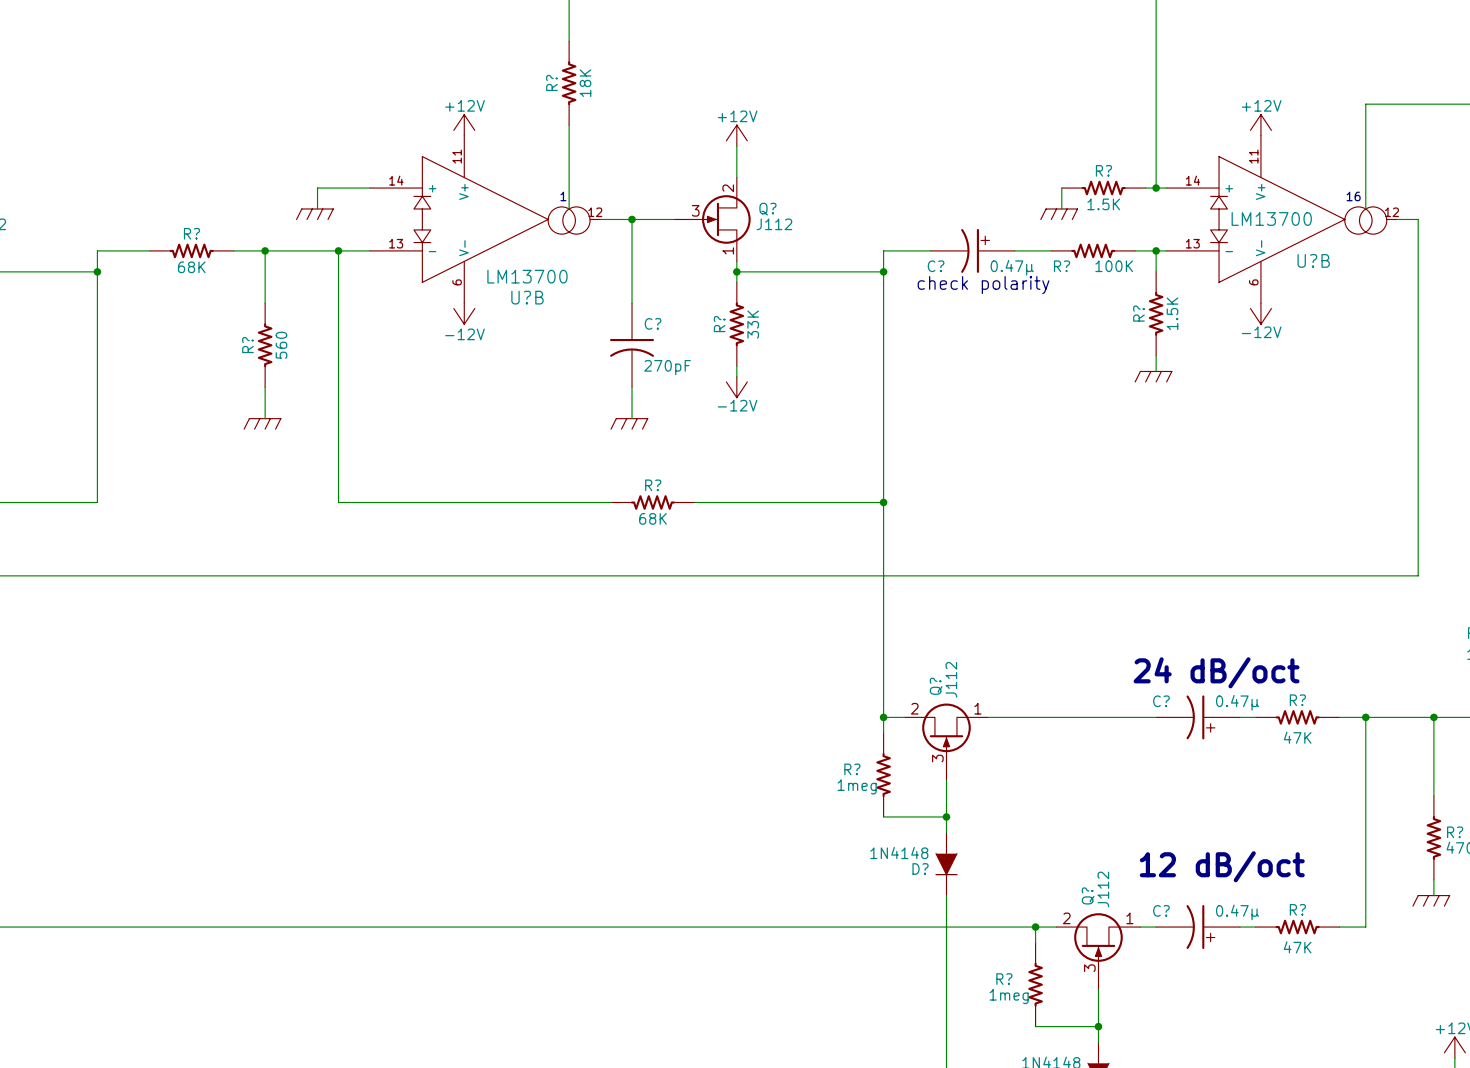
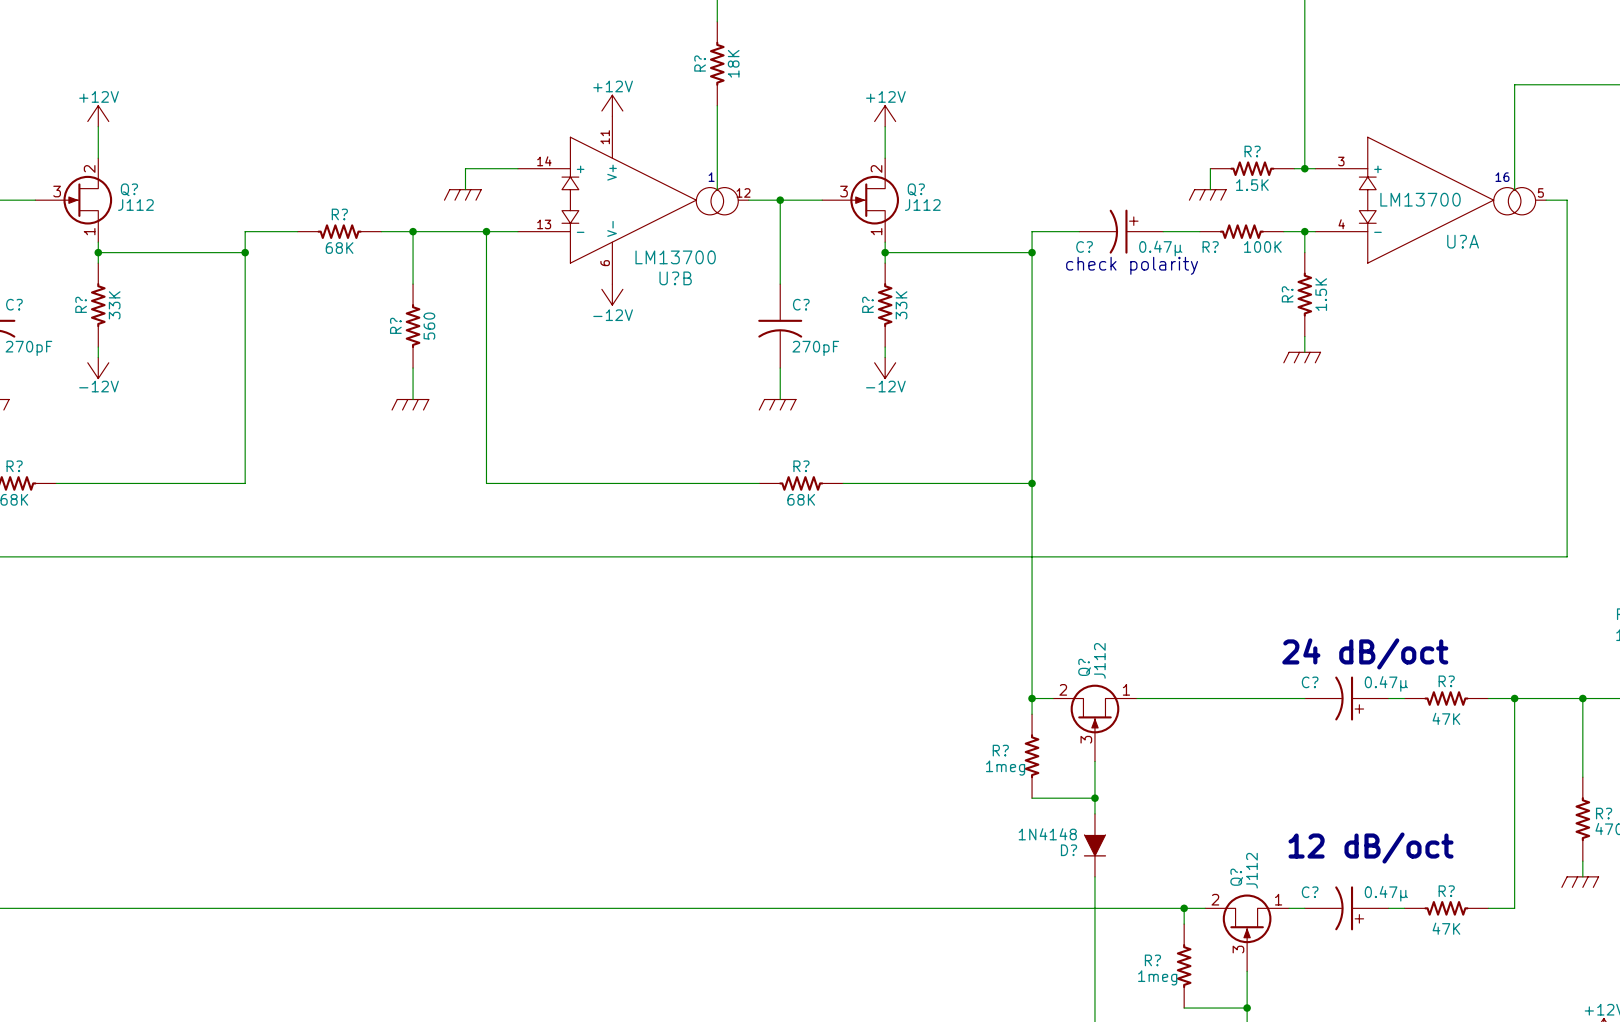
power symbol: +12V (1260, 125) -> none
U?B: LM13700 (1281, 219) -> none
U?A: none -> LM13700 (1430, 200)
power symbol: -12V (1260, 313) -> none

